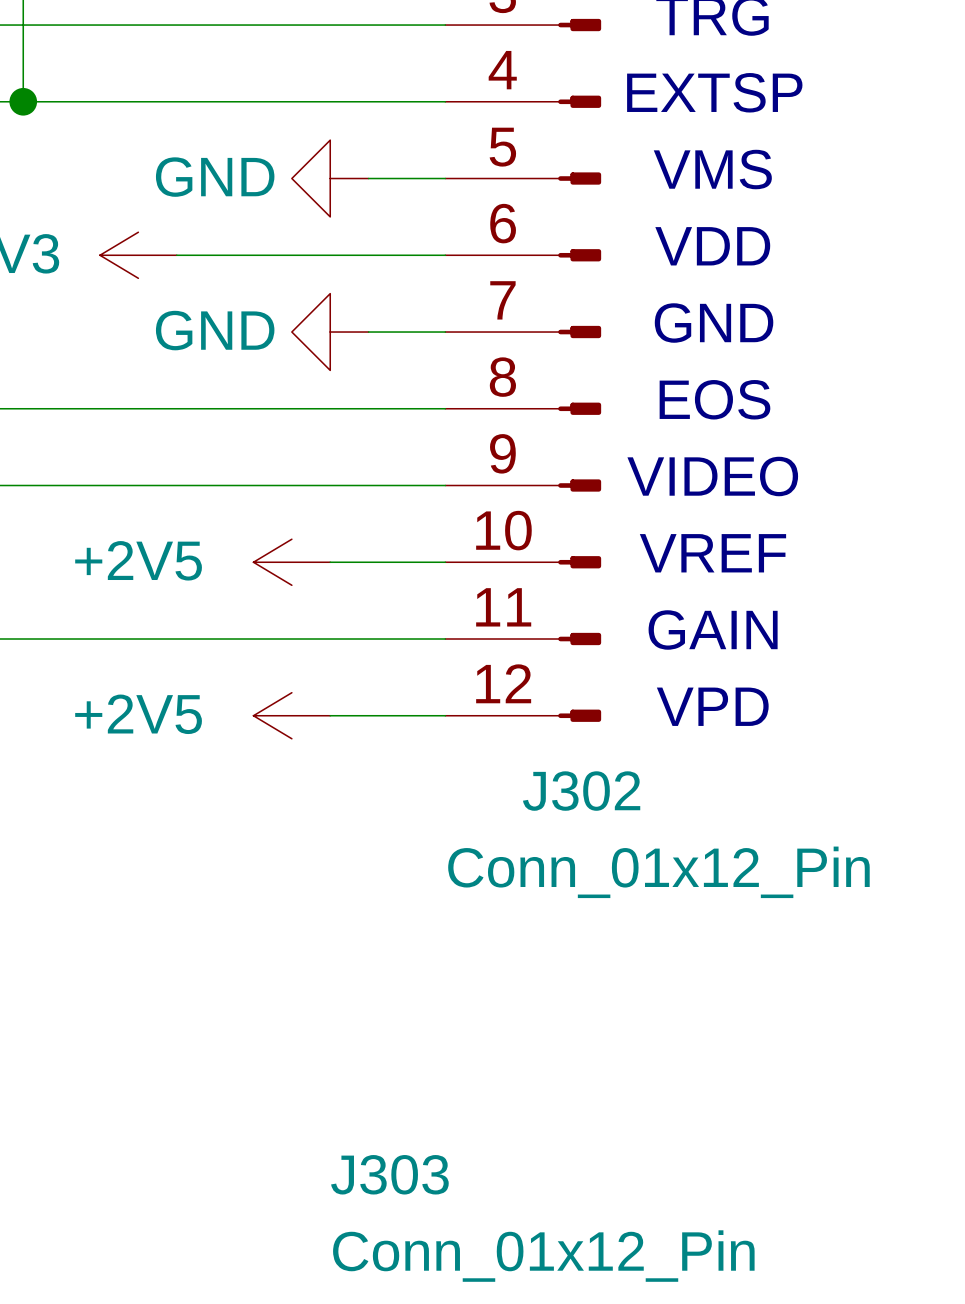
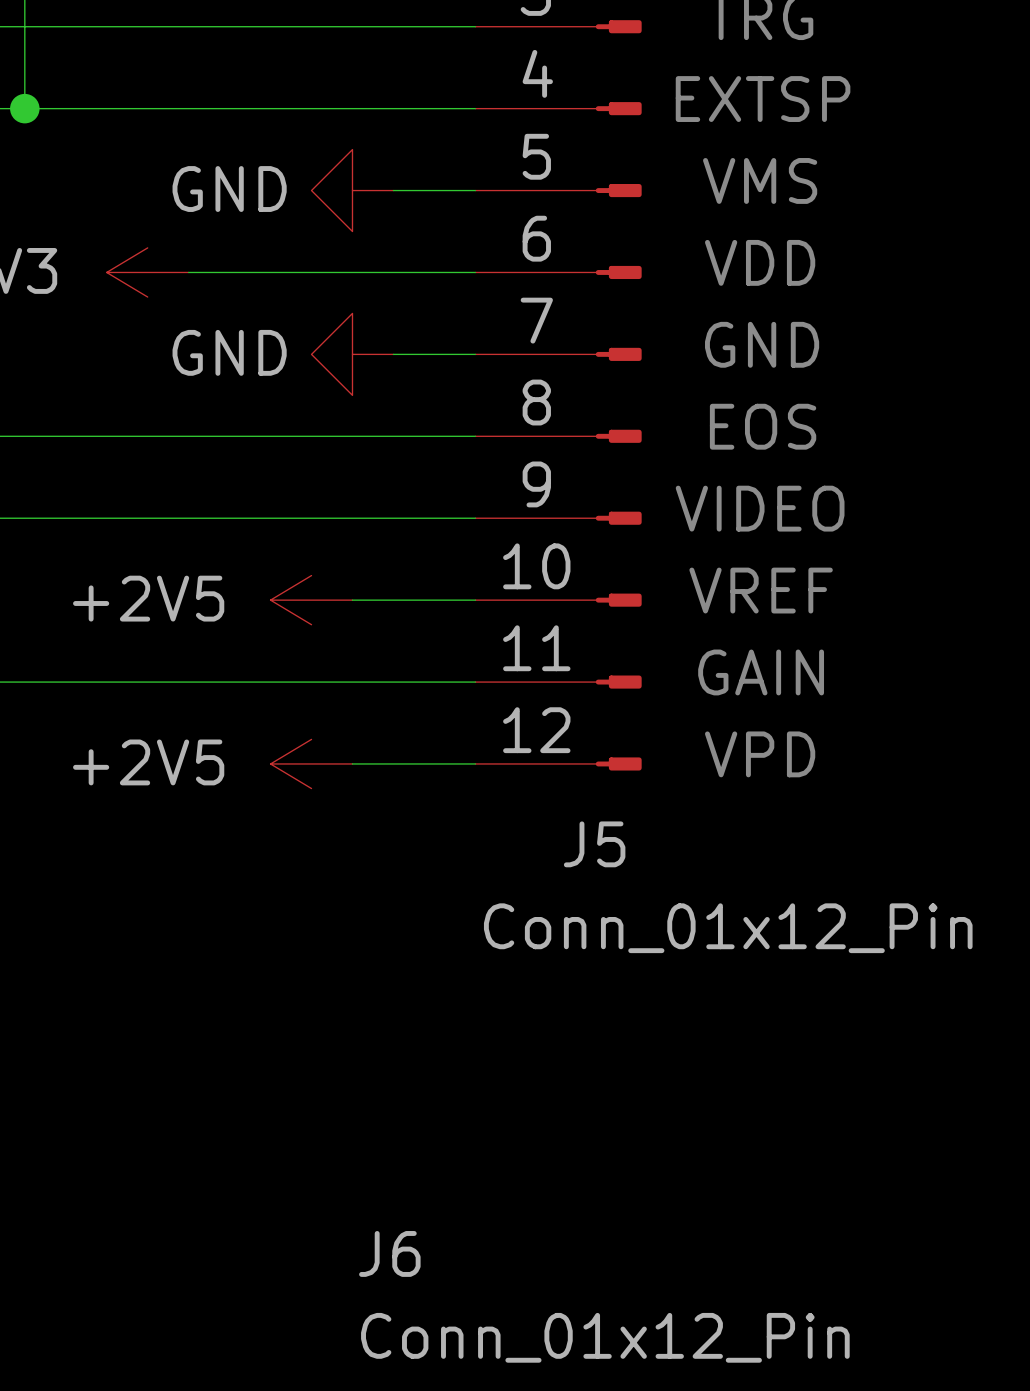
J302 name: J302 (581, 791) -> J5 (594, 844)
J303 name: J303 (389, 1174) -> J6 (389, 1253)

